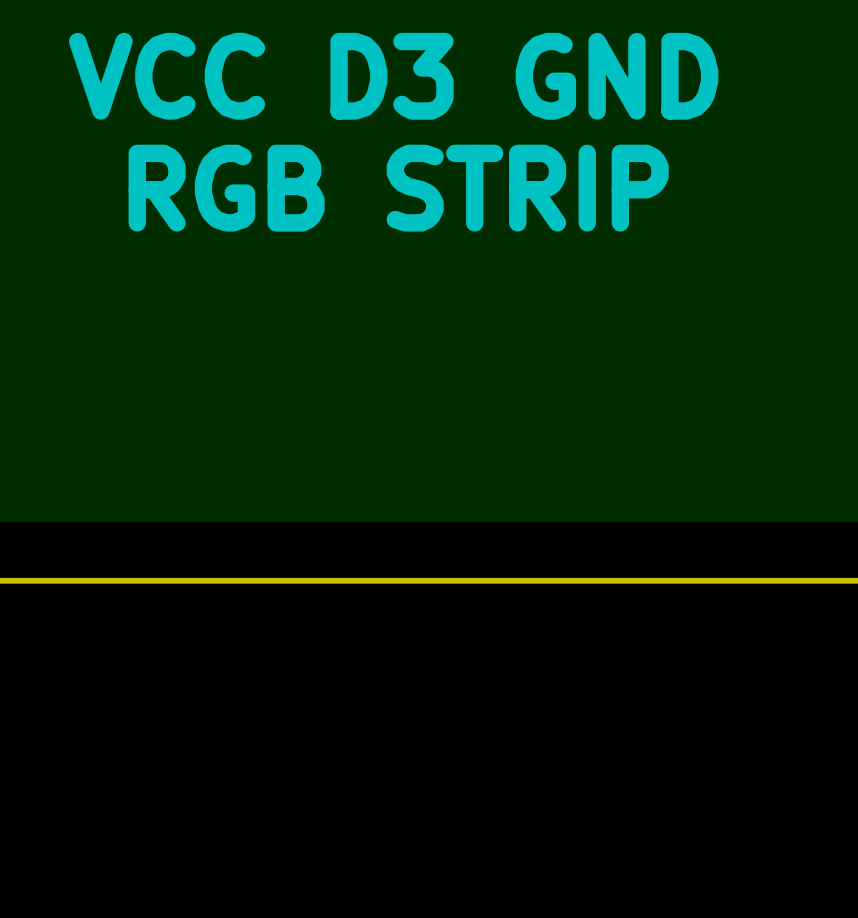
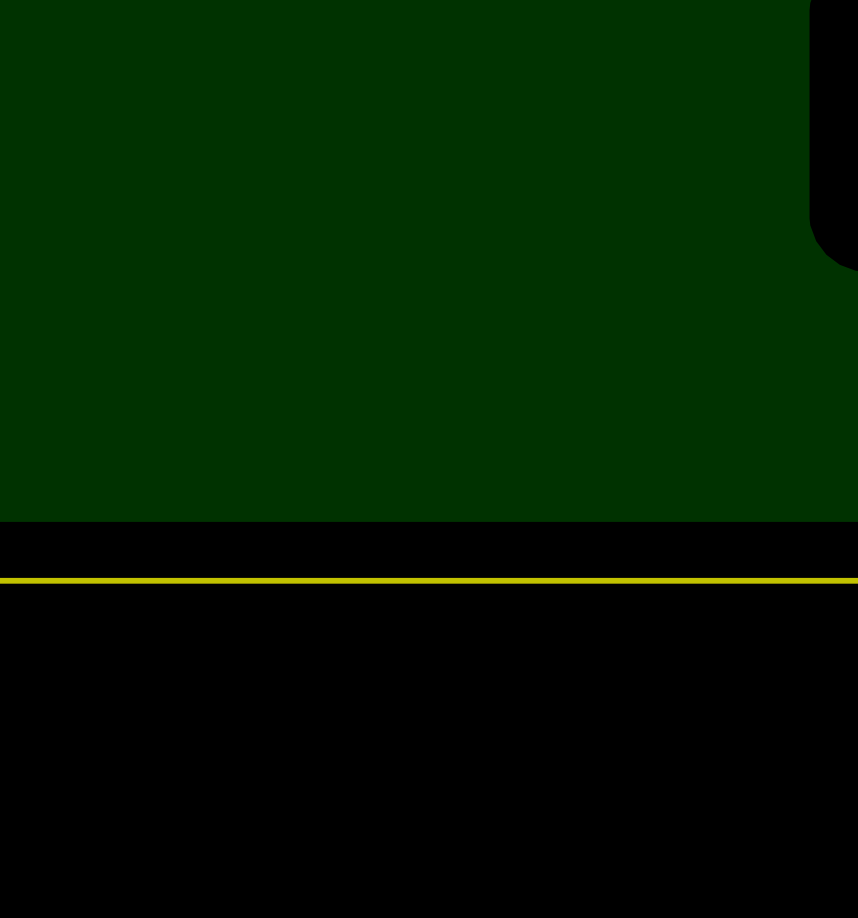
text: VCC D3 GND (393, 76) -> none
text: RGB STRIP (398, 188) -> none

